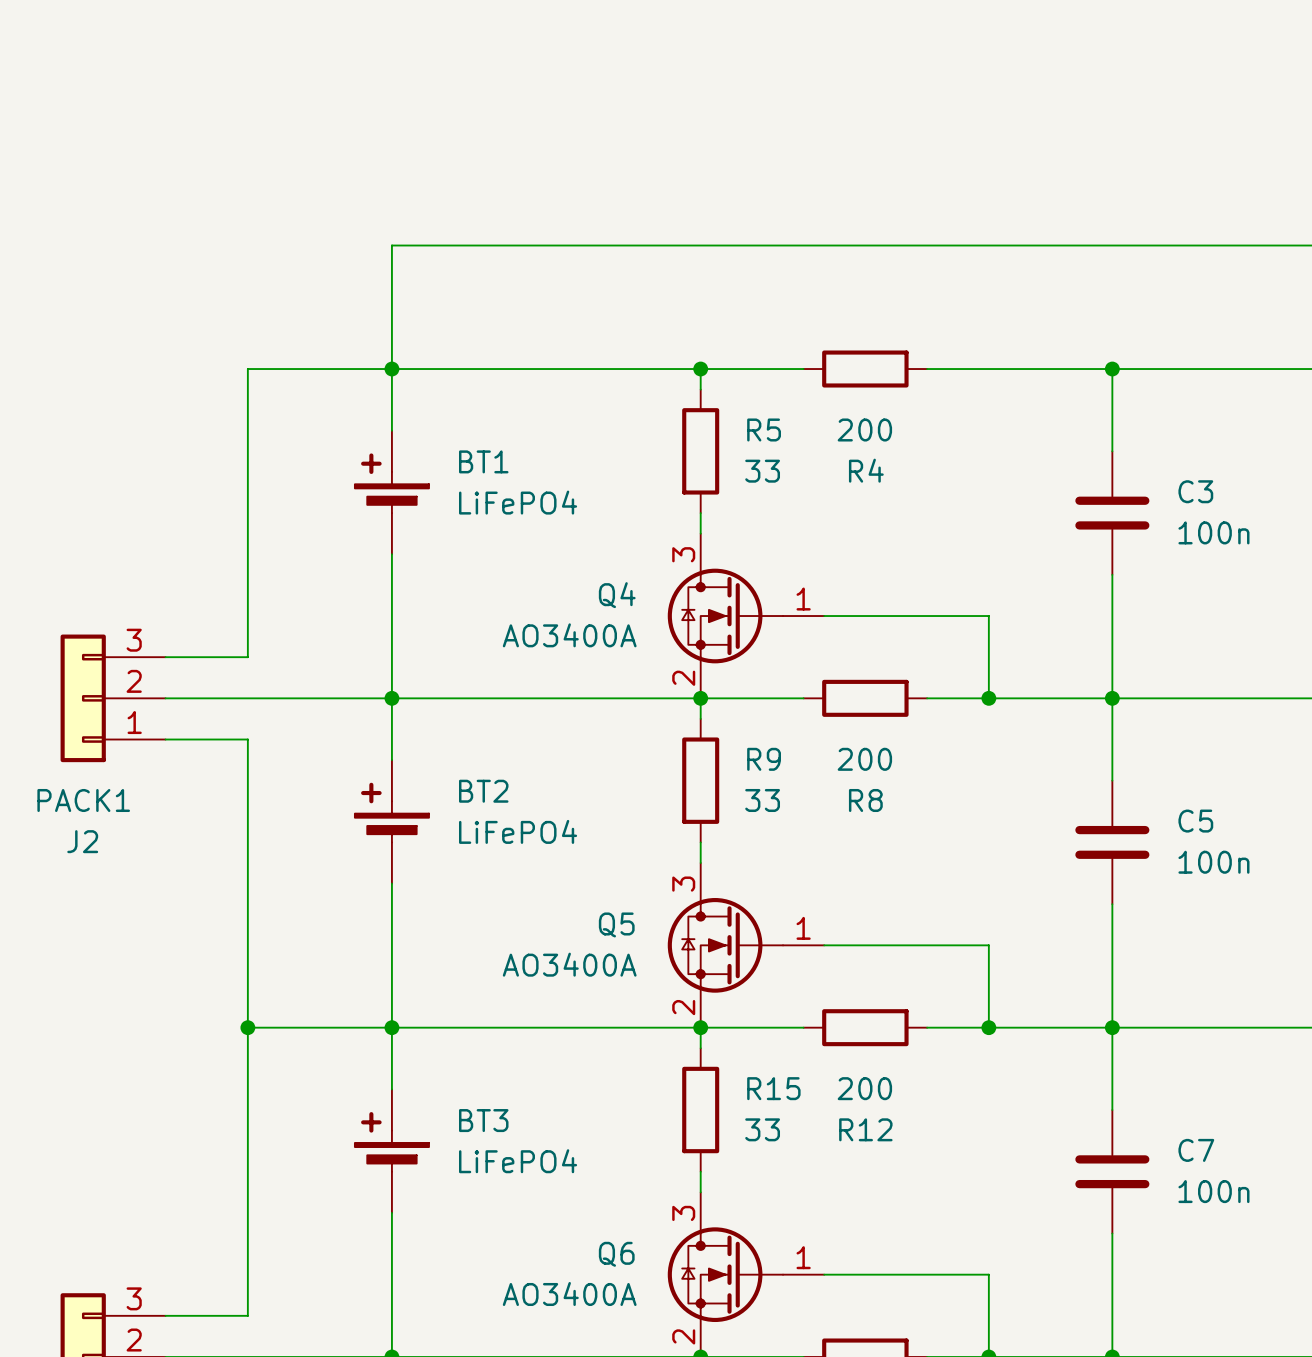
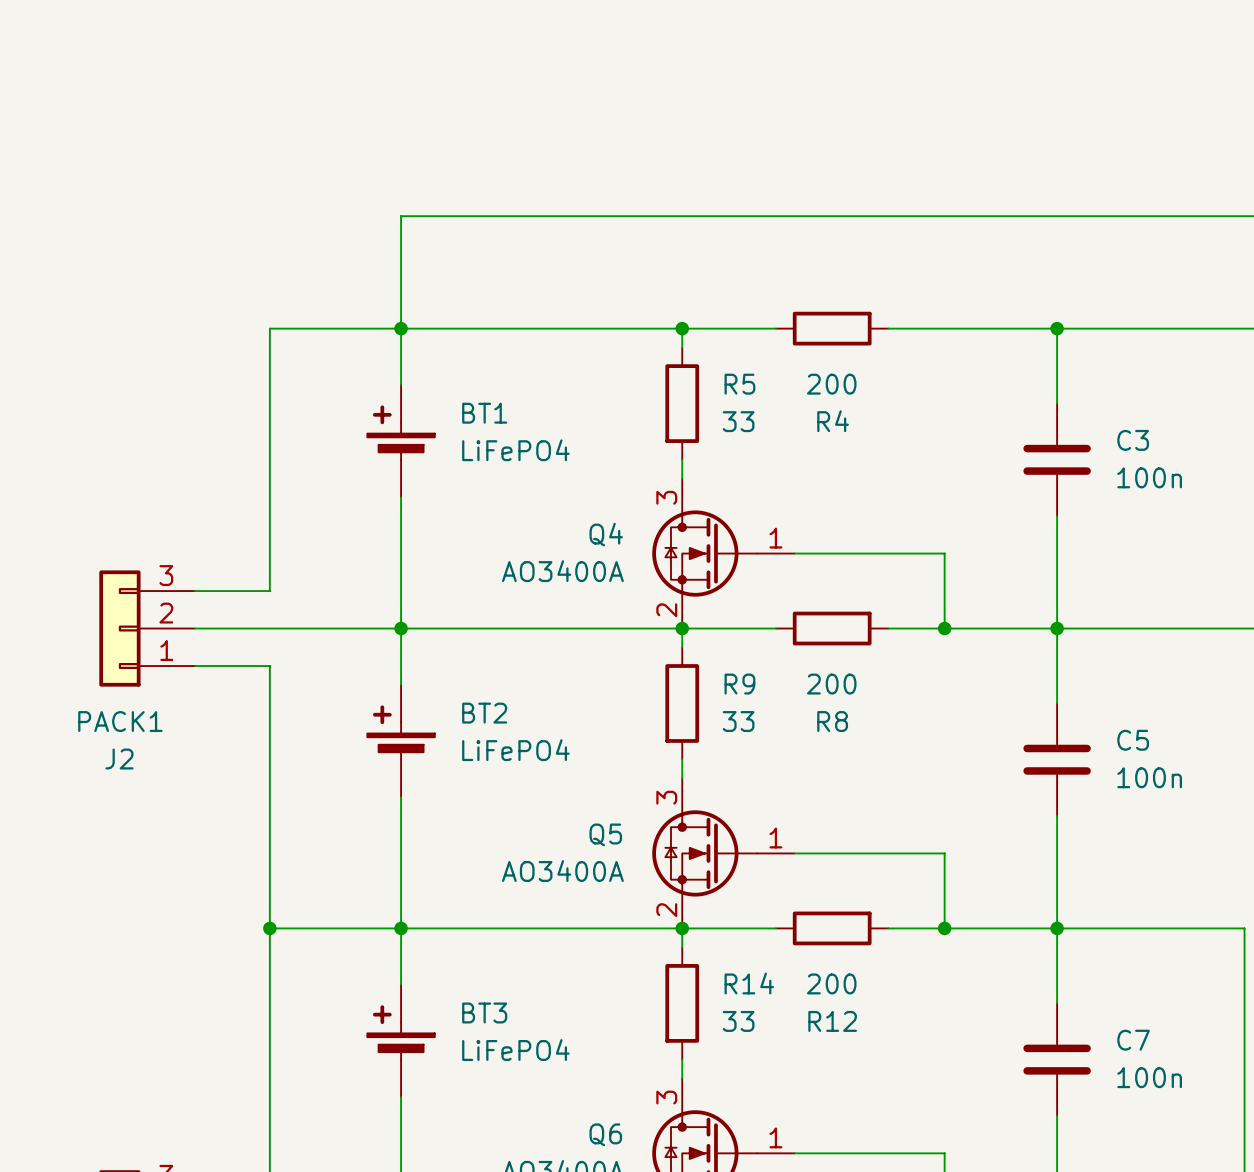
R15 name: R15 (773, 1088) -> R14 (749, 983)

